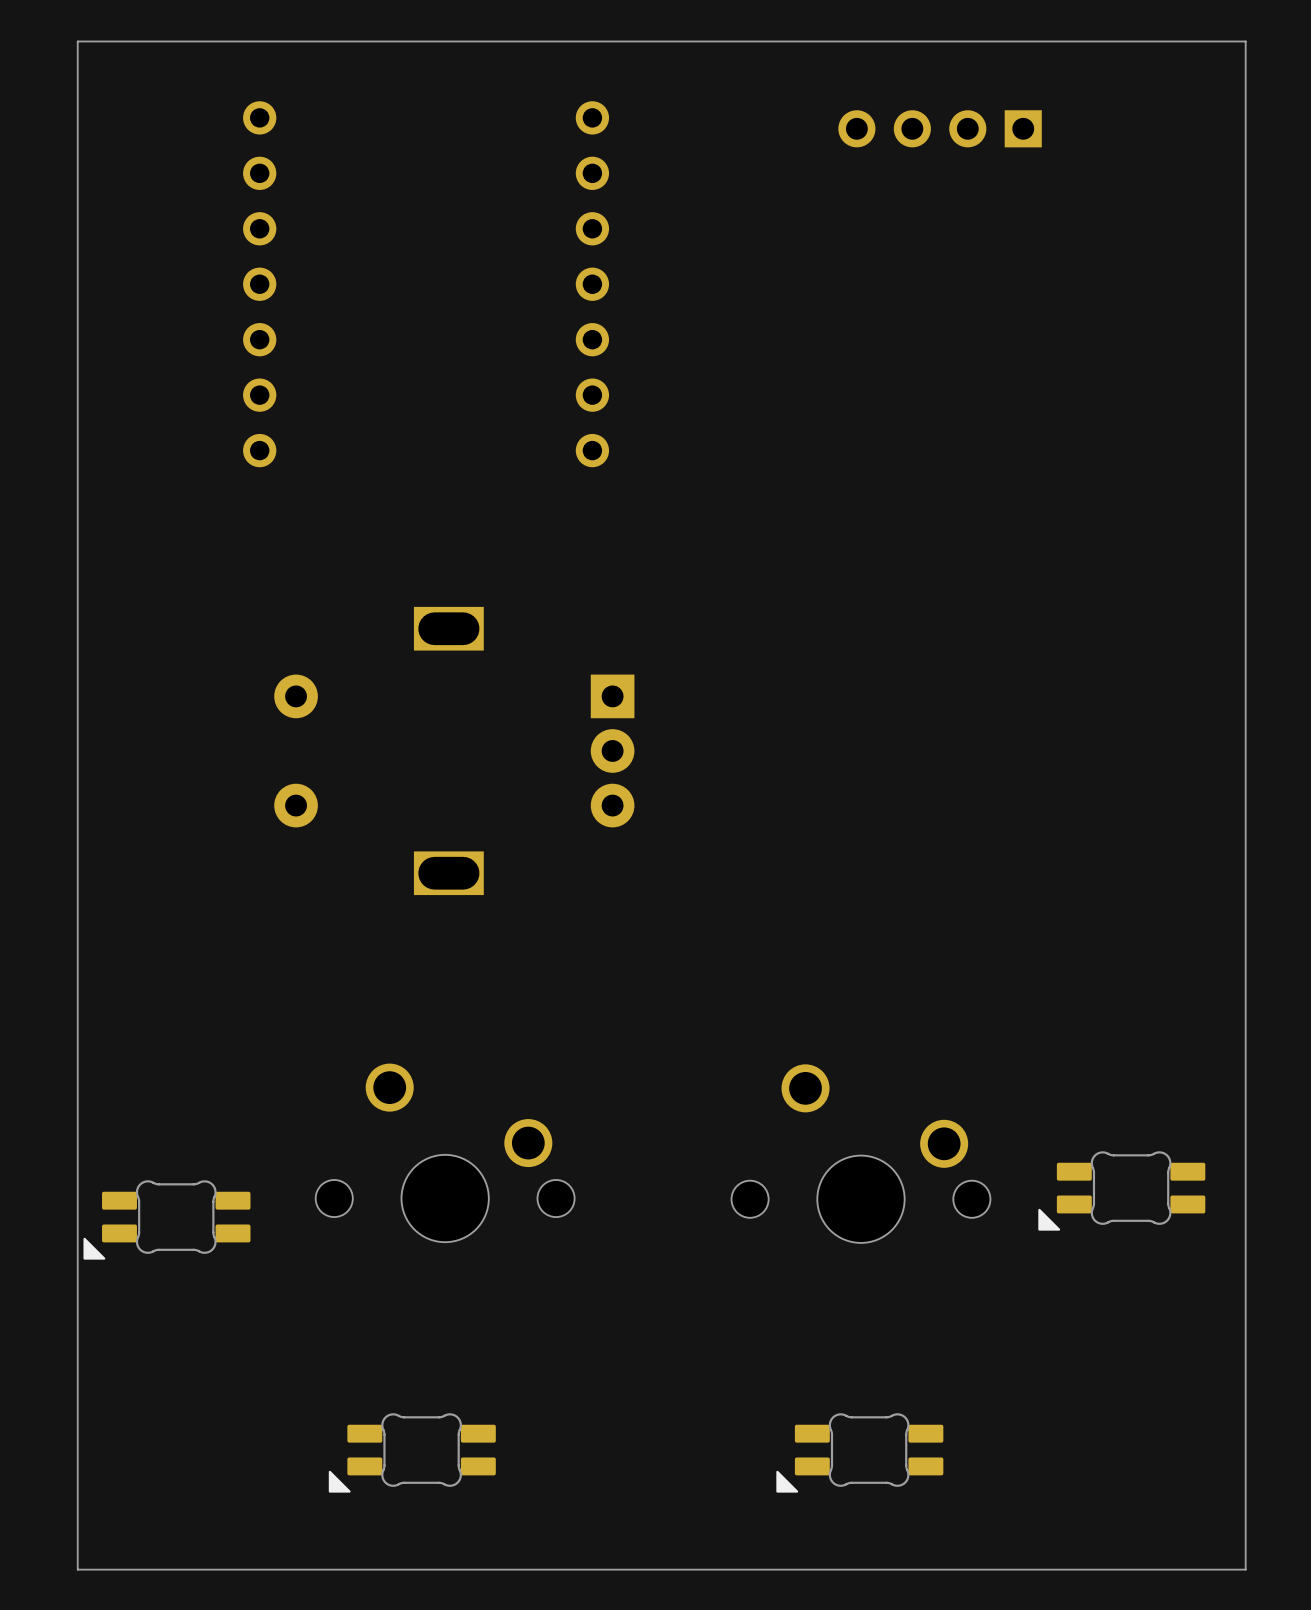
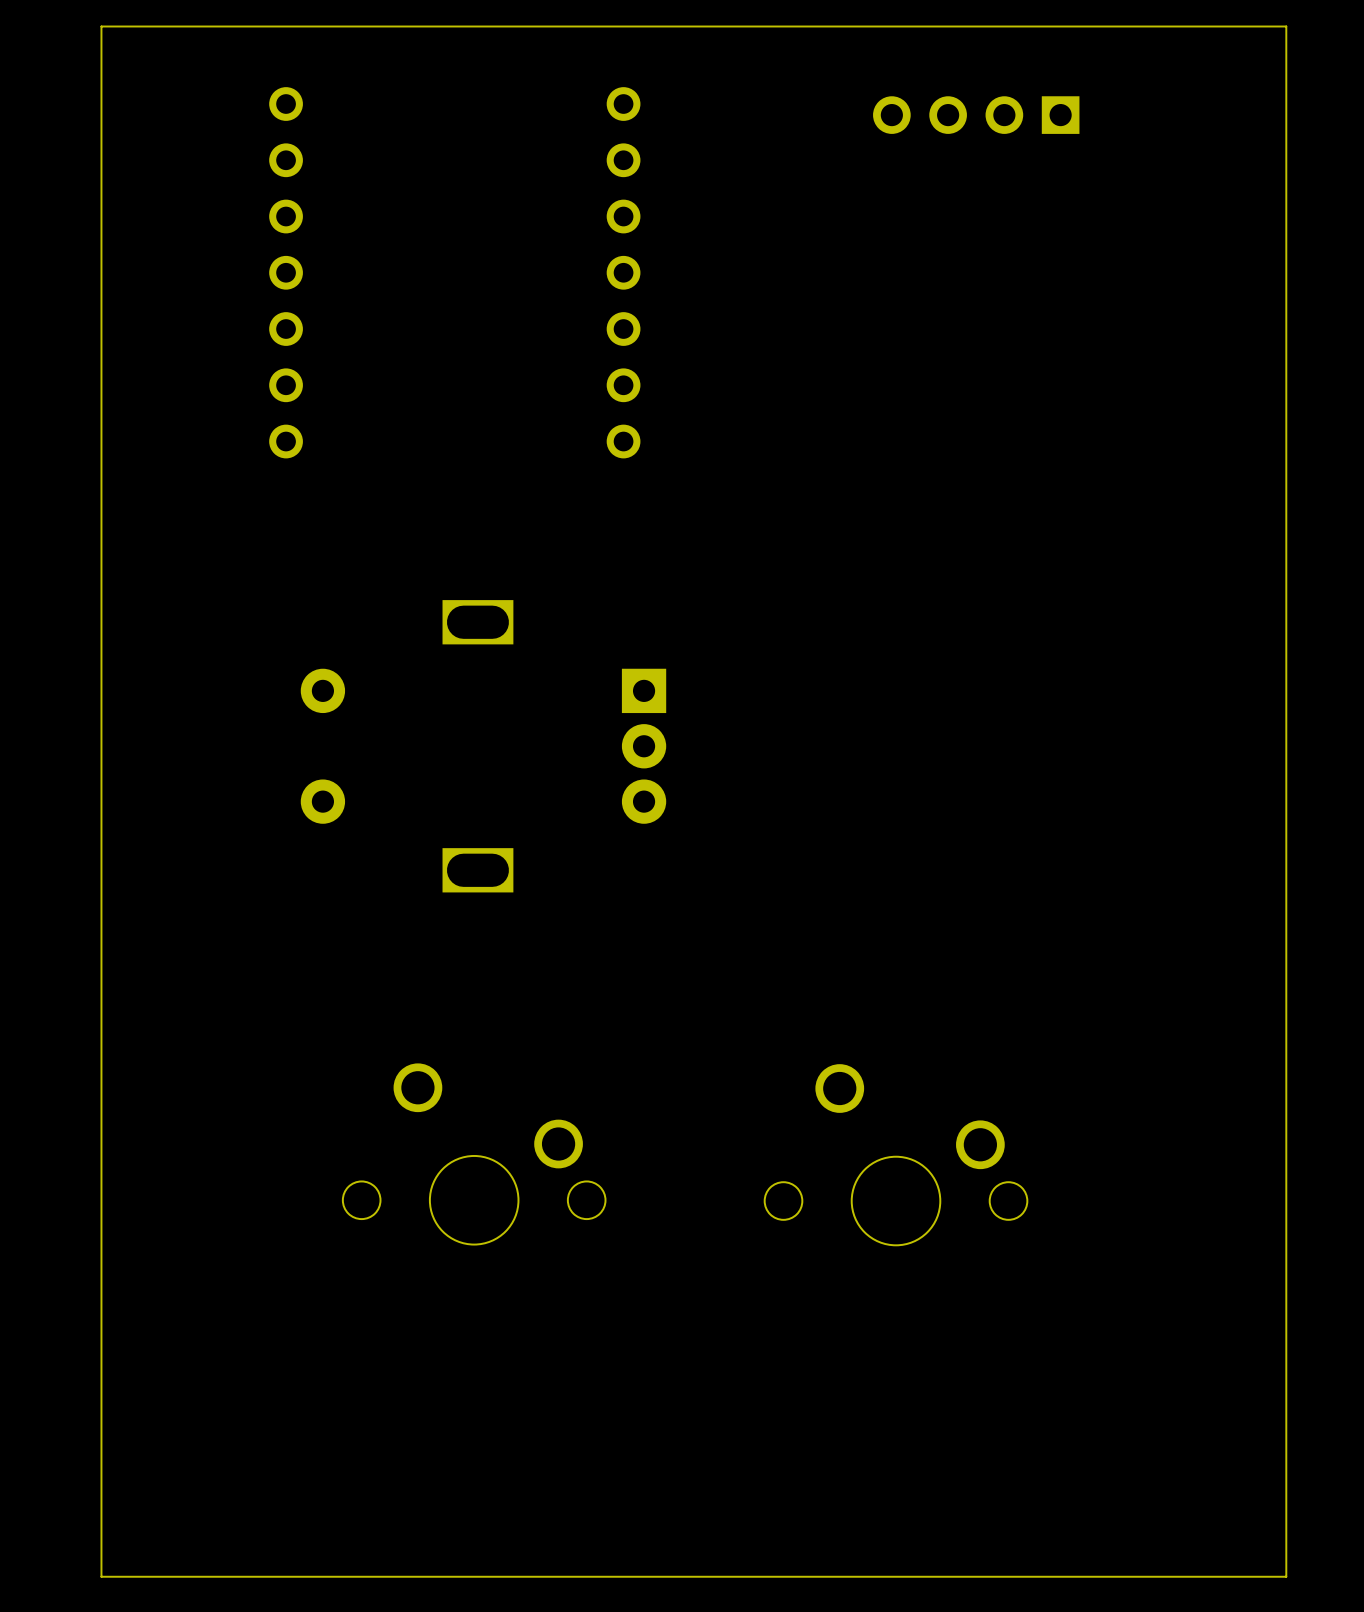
part: (1121, 1190) -> none
part: (166, 1219) -> none
part: (412, 1452) -> none
part: (859, 1452) -> none

